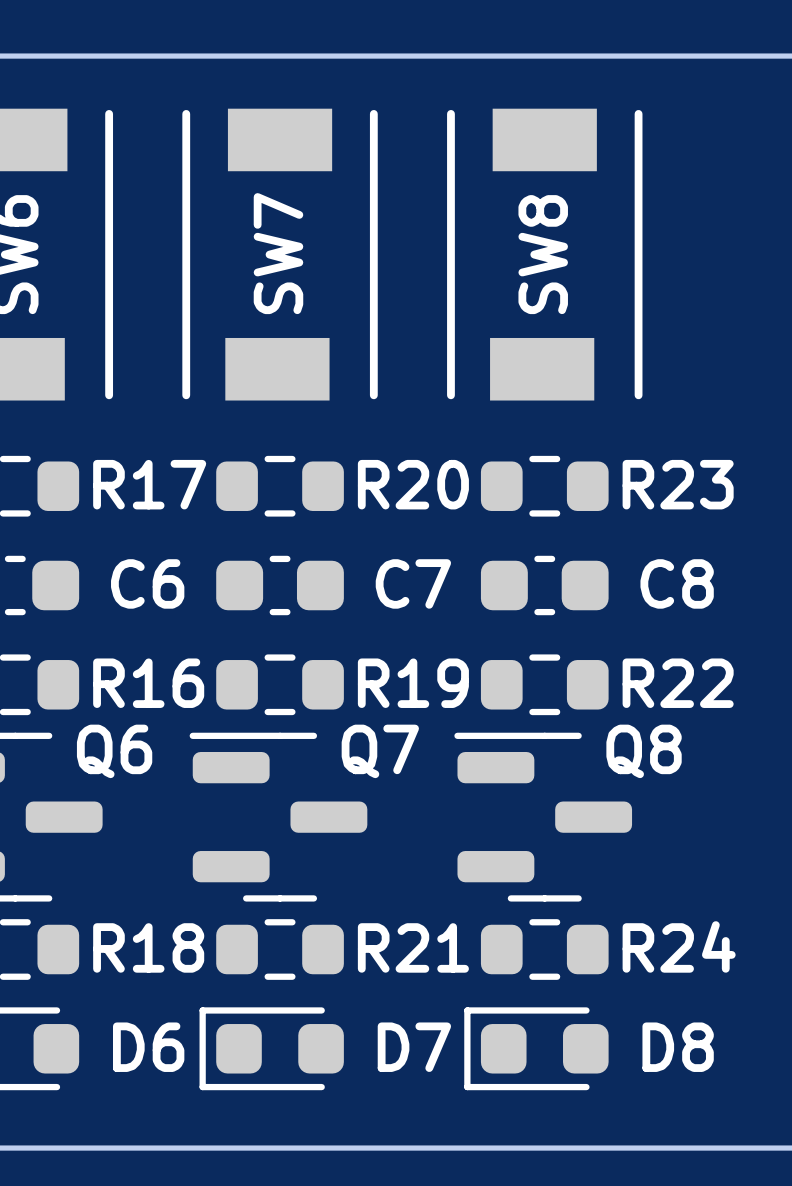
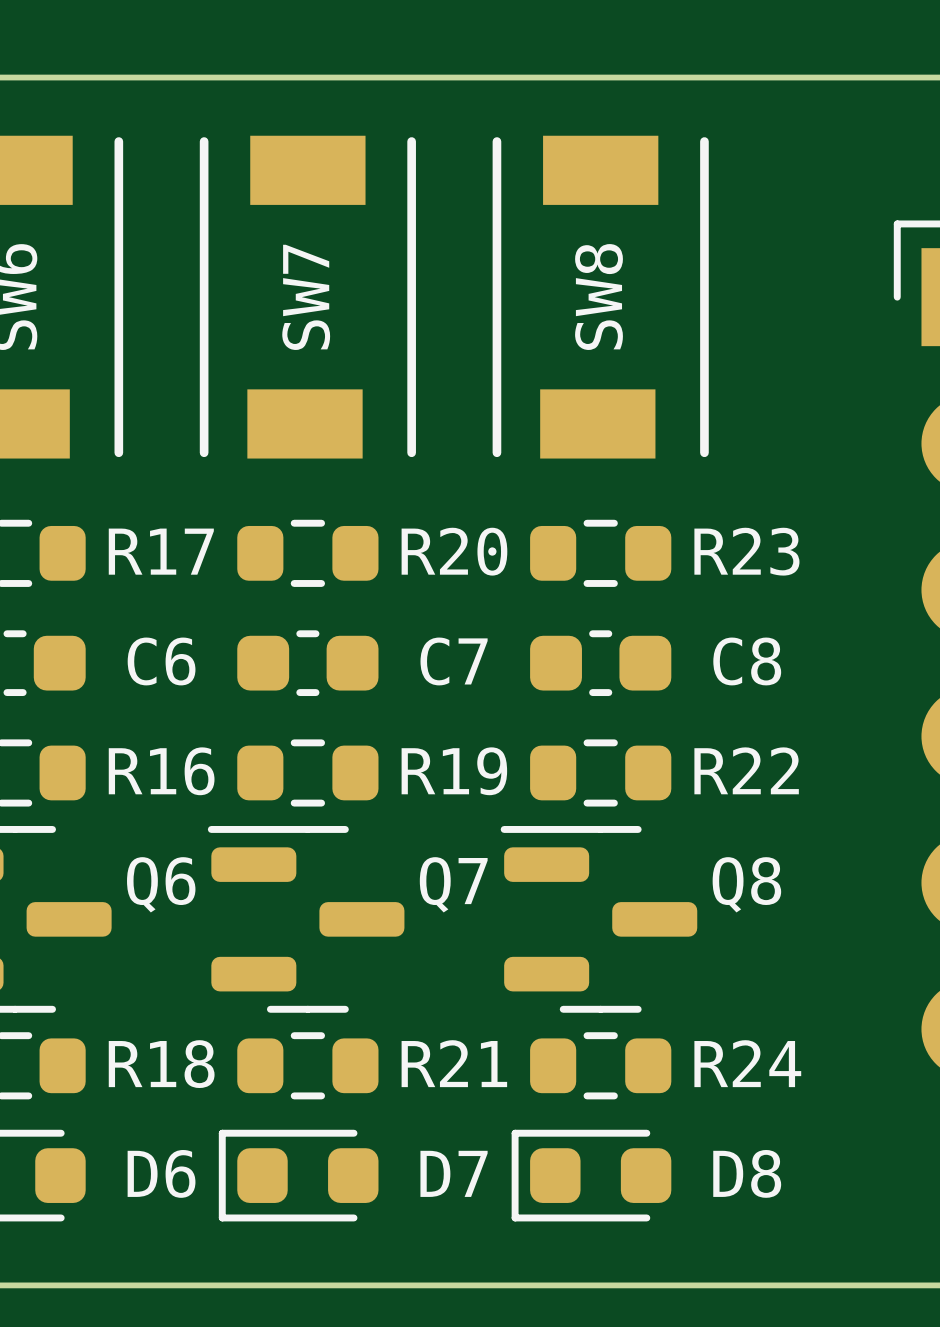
Q6 name position: Q6 (114, 751) -> Q6 (161, 884)
Q7 name position: Q7 (380, 751) -> Q7 (453, 884)
Q8 name position: Q8 (644, 751) -> Q8 (746, 884)

